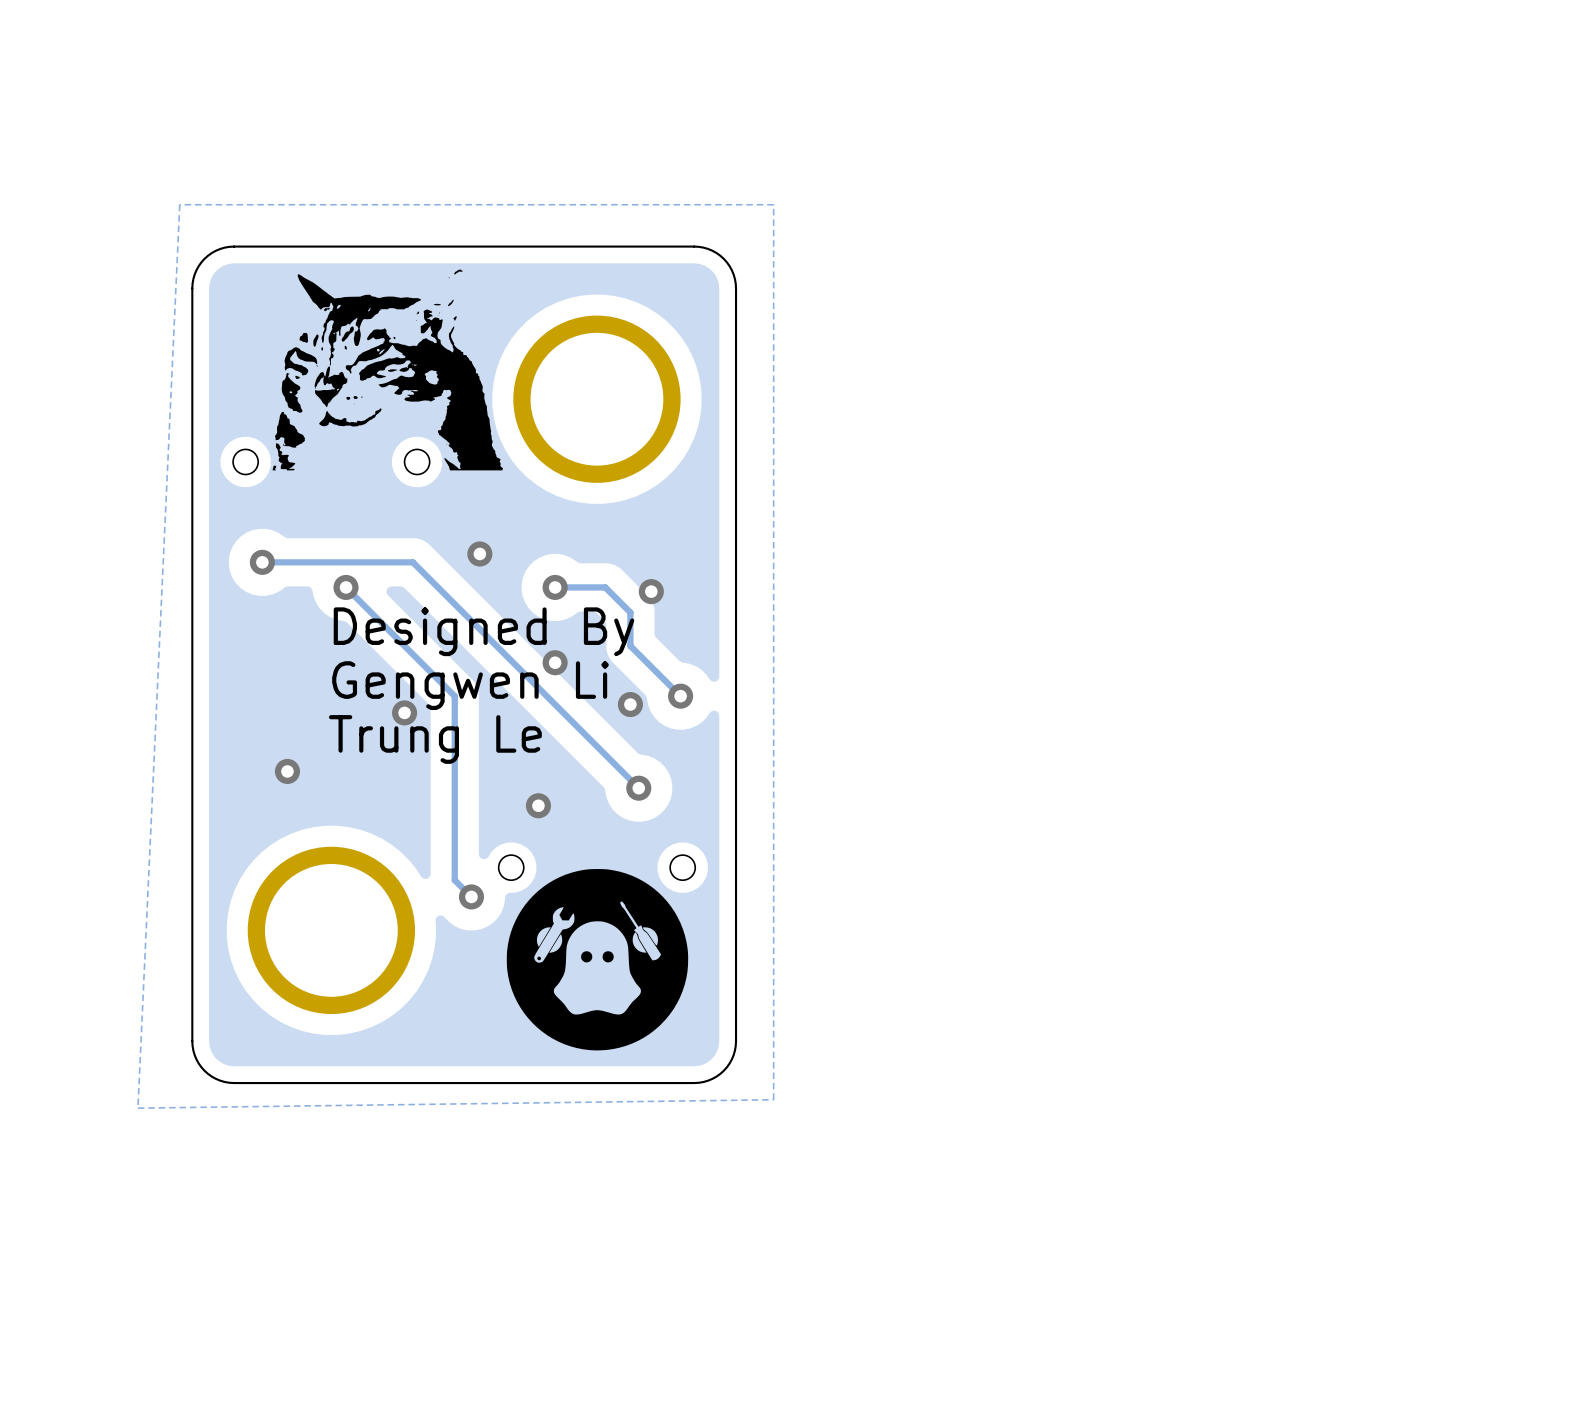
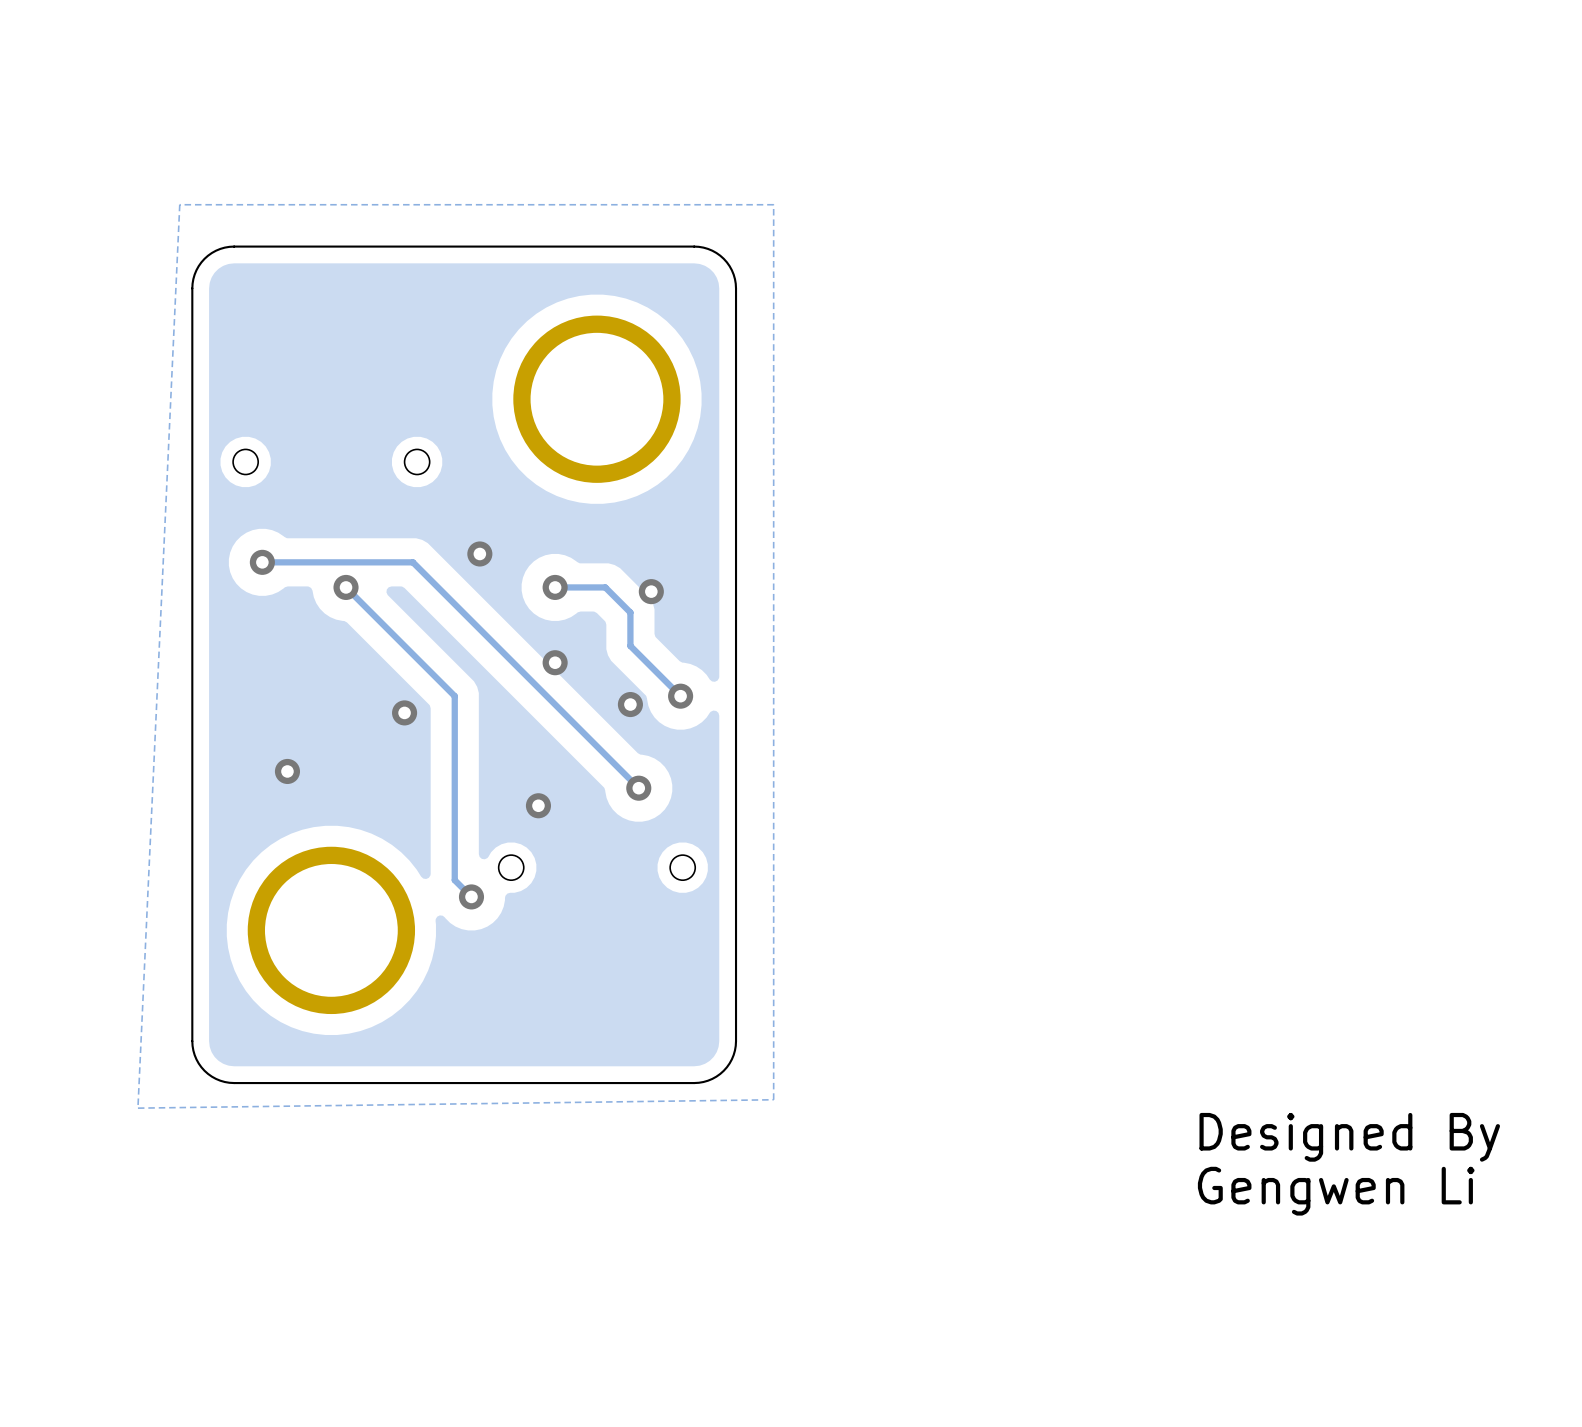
drawing: [272, 269, 504, 471] -> none
text position: Designed By (484, 631) -> Designed By (1349, 1137)
text position: Gengwen Li (470, 685) -> Gengwen Li (1336, 1191)
text: Trung Le (435, 739) -> none
drawing: [506, 869, 689, 1051] -> none

